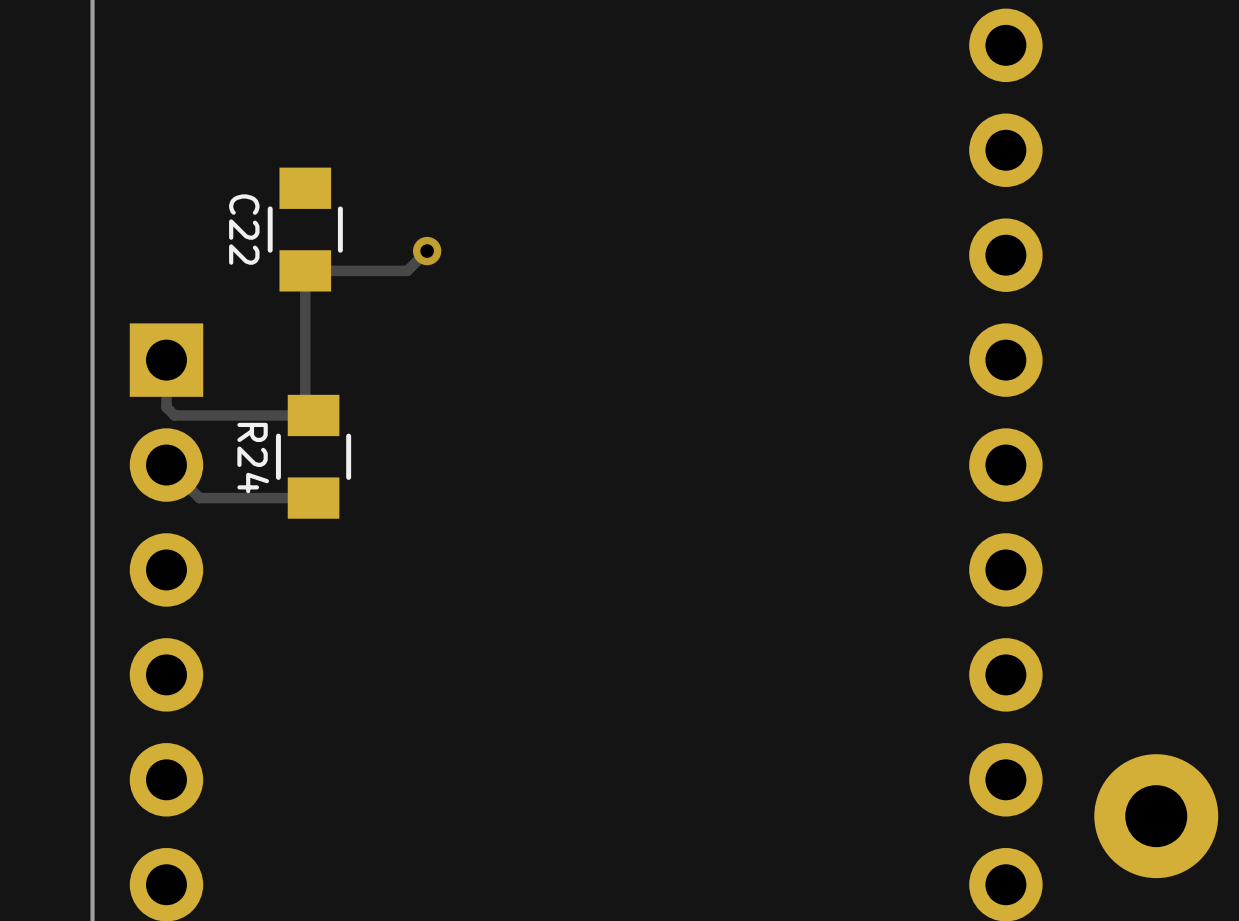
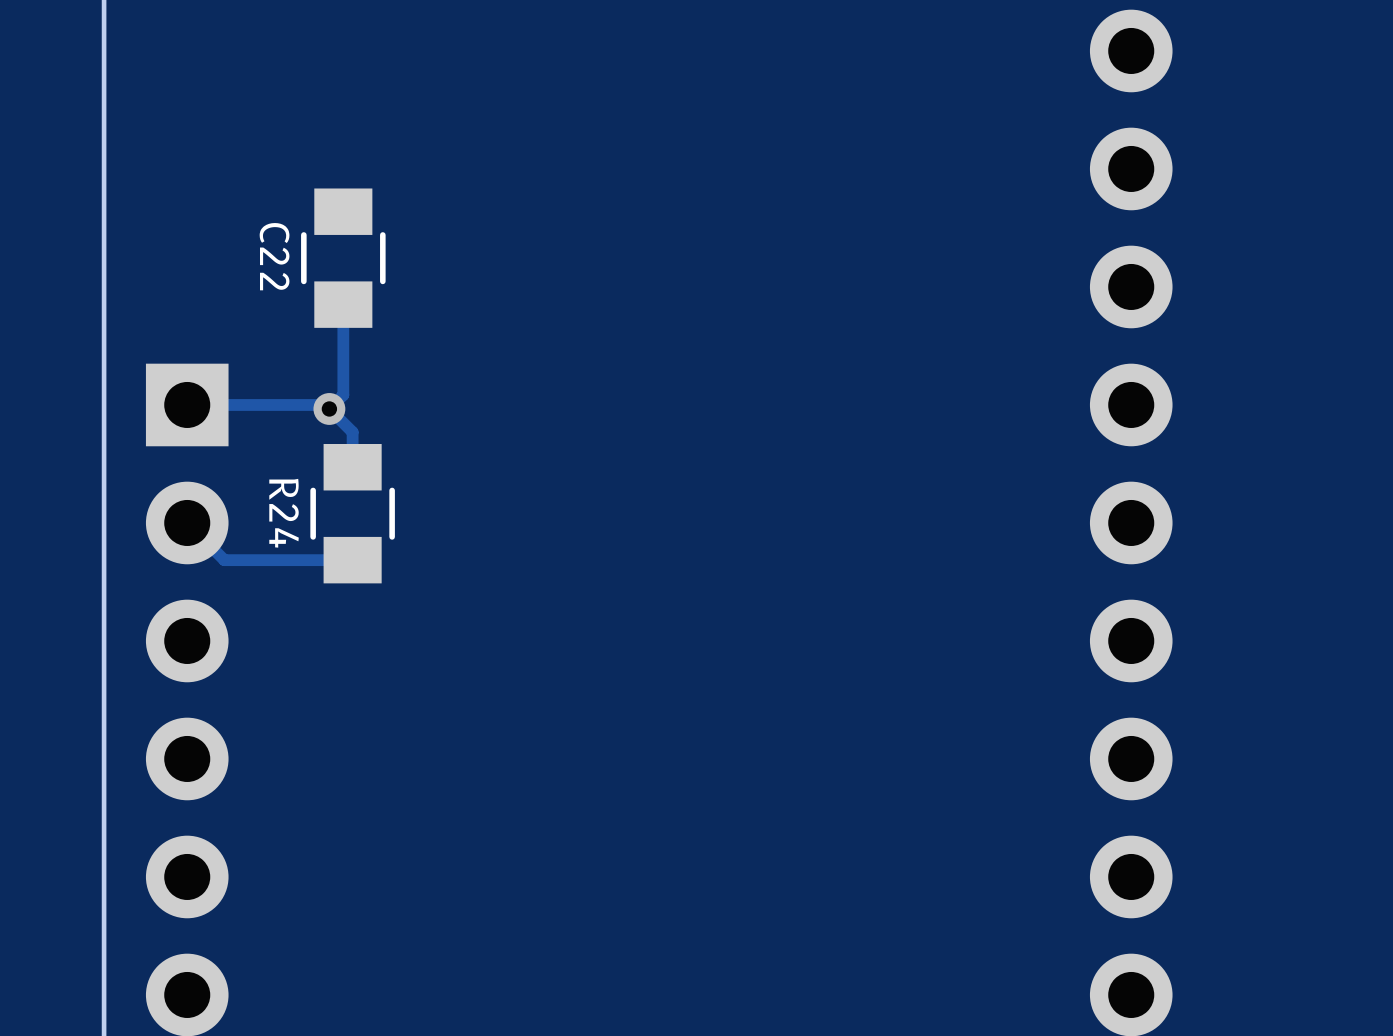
track: (427, 251) (407, 270) (305, 270) -> none
via position: (427, 251) -> (329, 408)
track: (305, 351) (305, 407) (313, 415) (174, 415) (166, 407) (166, 360) -> (352, 467) (352, 432) (325, 404) (187, 404)
part: (1156, 816) -> none

